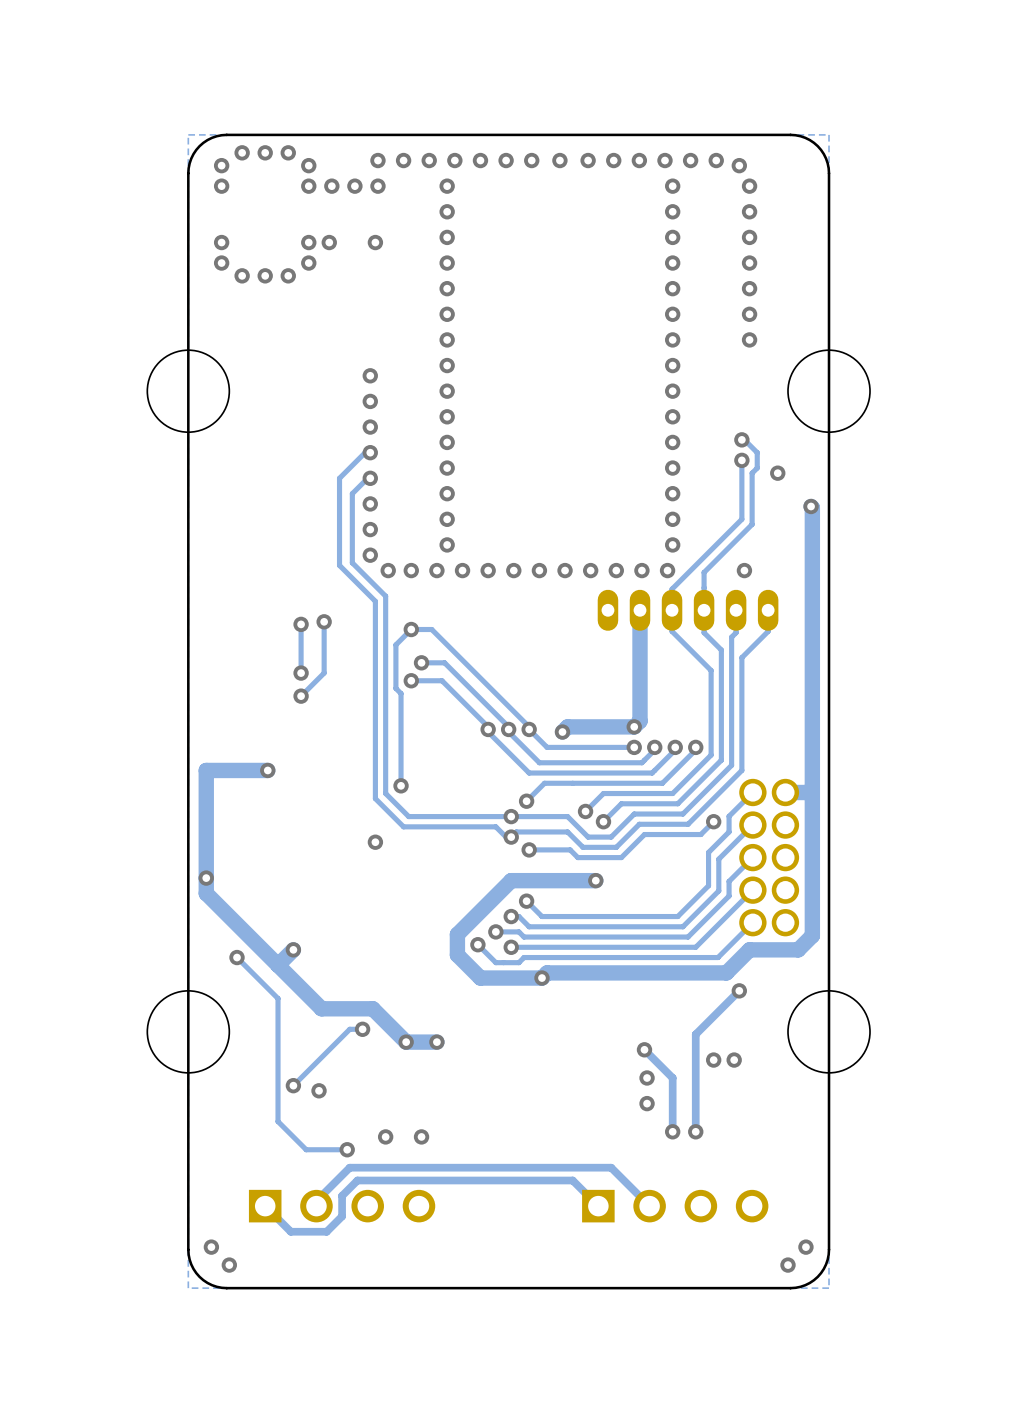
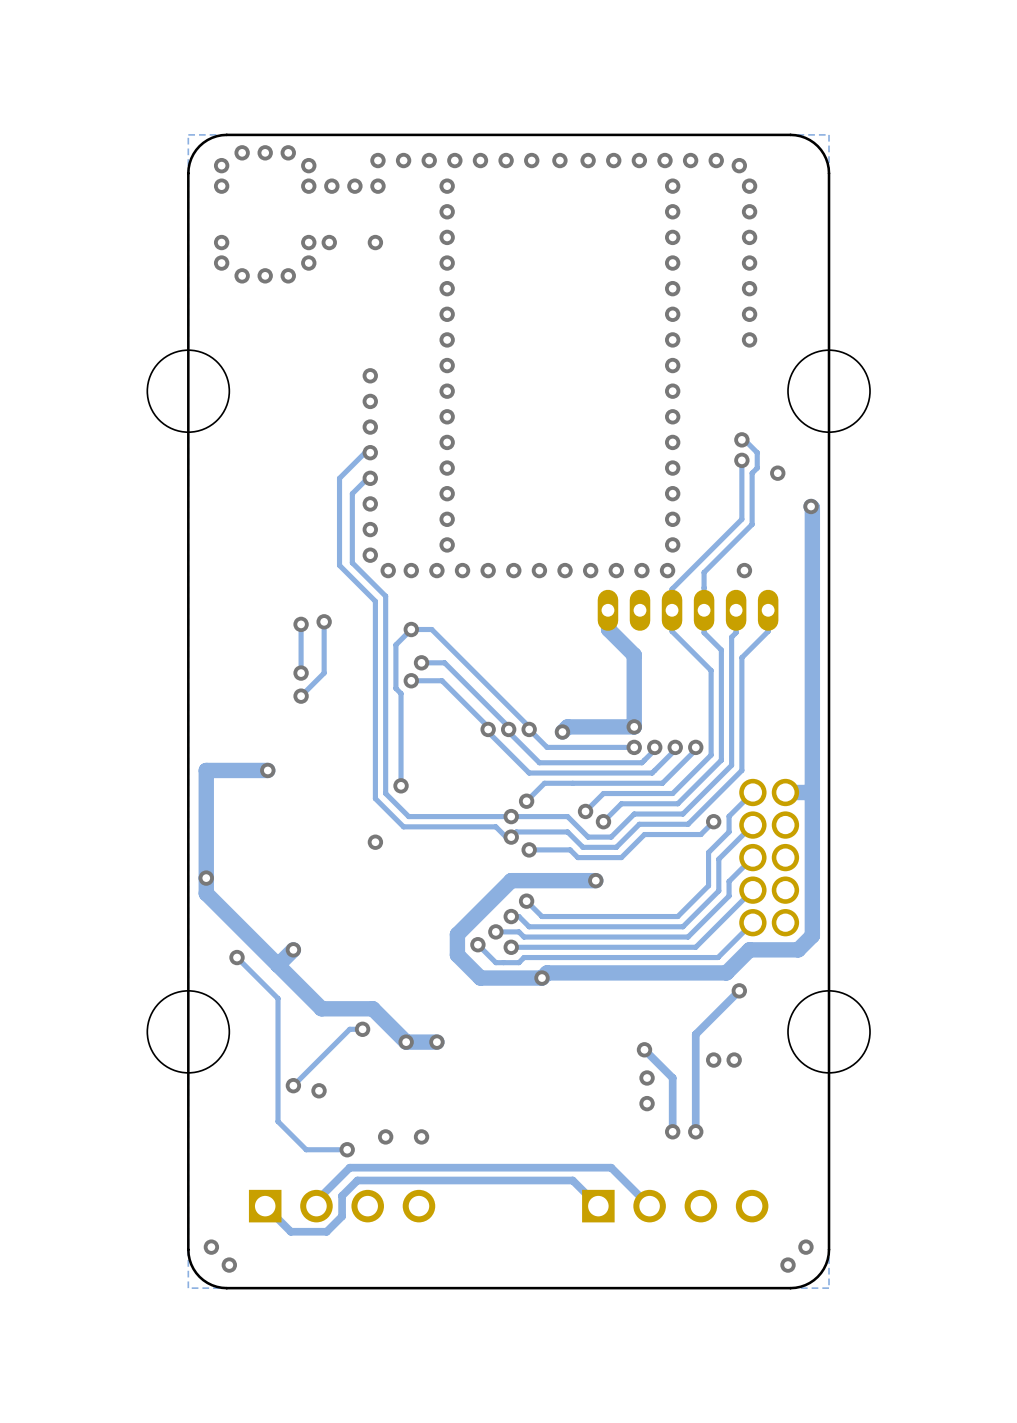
track: (640, 610) (640, 721) (634, 726) -> (607, 610) (608, 629) (634, 655) (634, 726)

